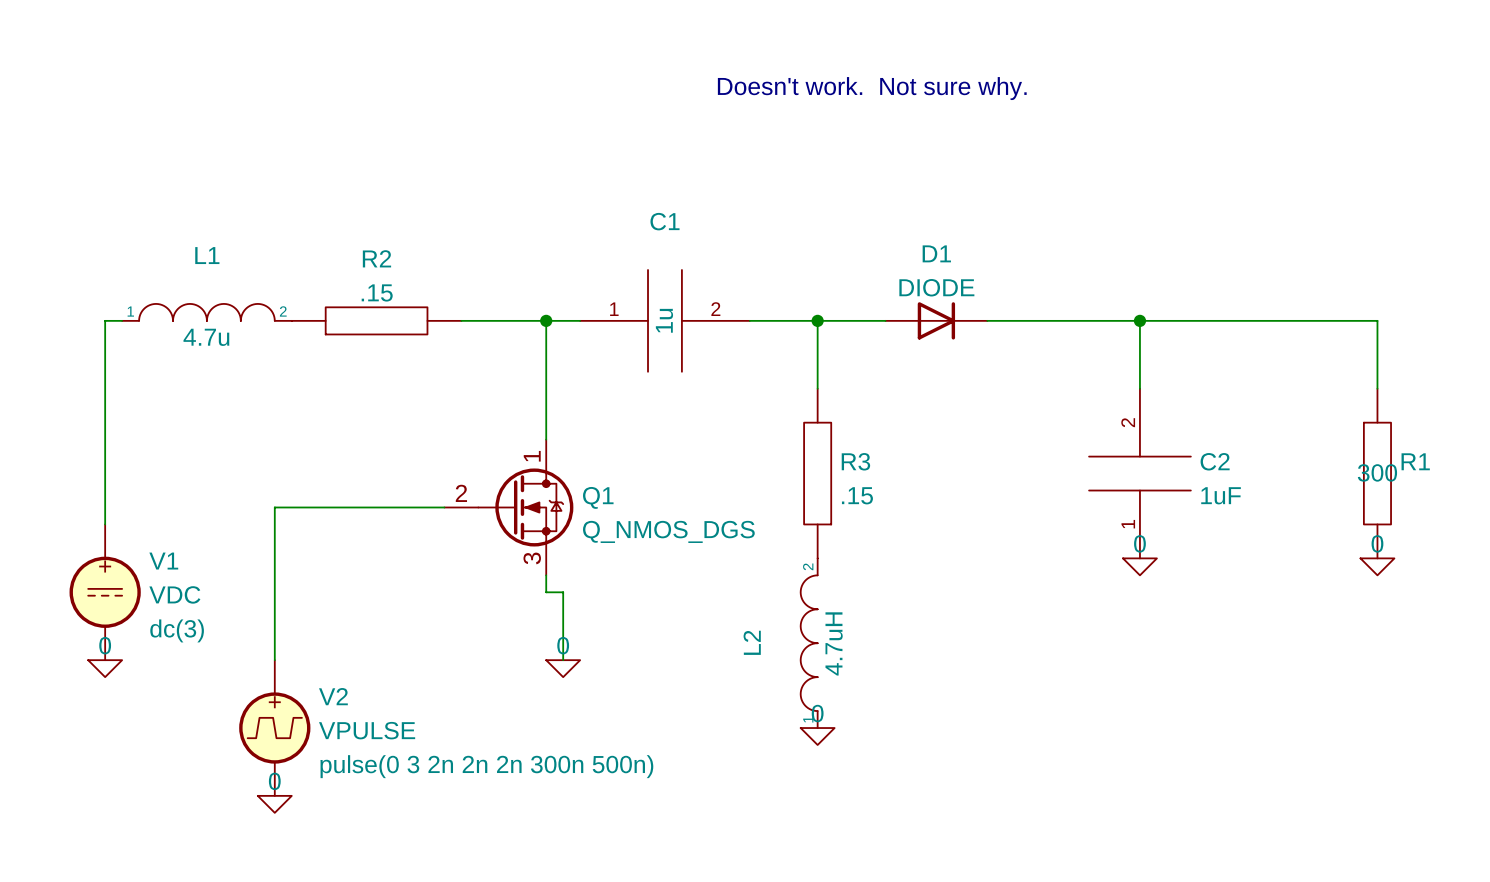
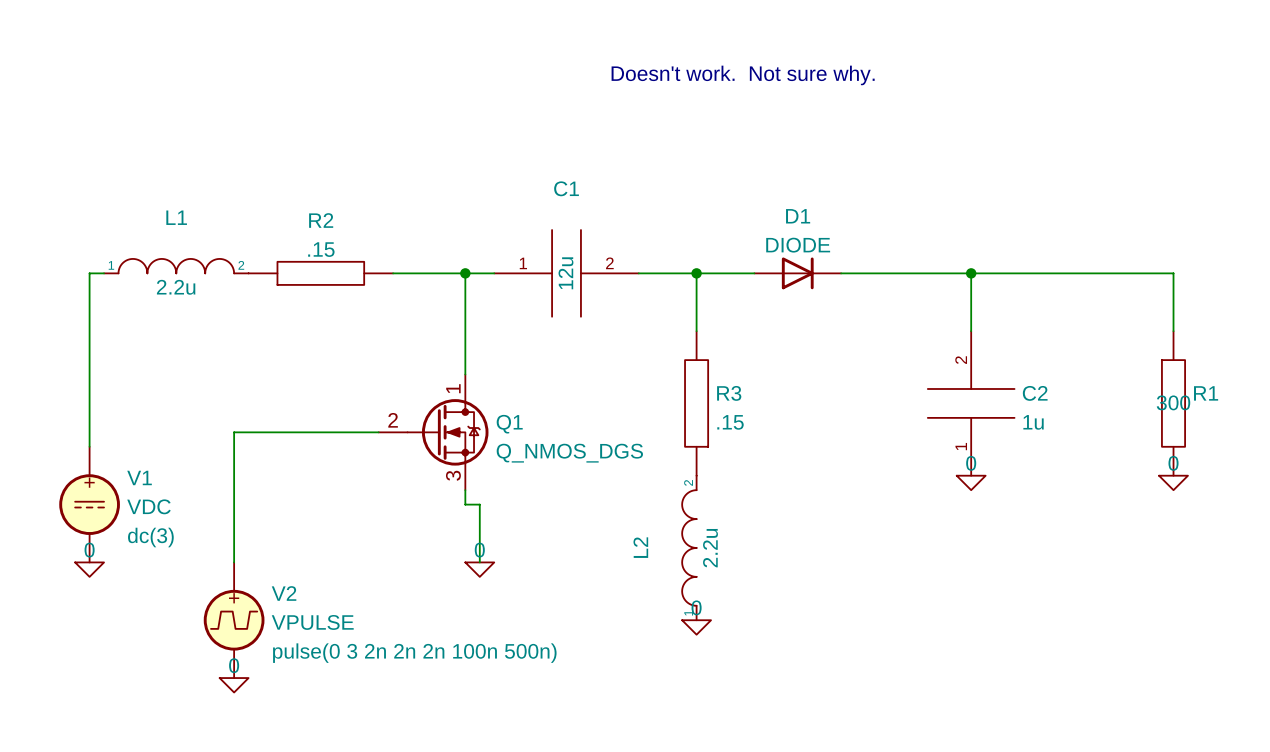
C1 text: 1u (664, 320) -> 12u (565, 273)
L1 text: 4.7u (206, 337) -> 2.2u (176, 287)
C2 text: 1uF (1221, 495) -> 1u (1033, 422)
L2 text: 4.7uH (834, 643) -> 2.2u (710, 548)
V2 text: pulse(0 3 2n 2n 2n 300n 500n) (486, 766) -> pulse(0 3 2n 2n 2n 100n 500n) (414, 653)

